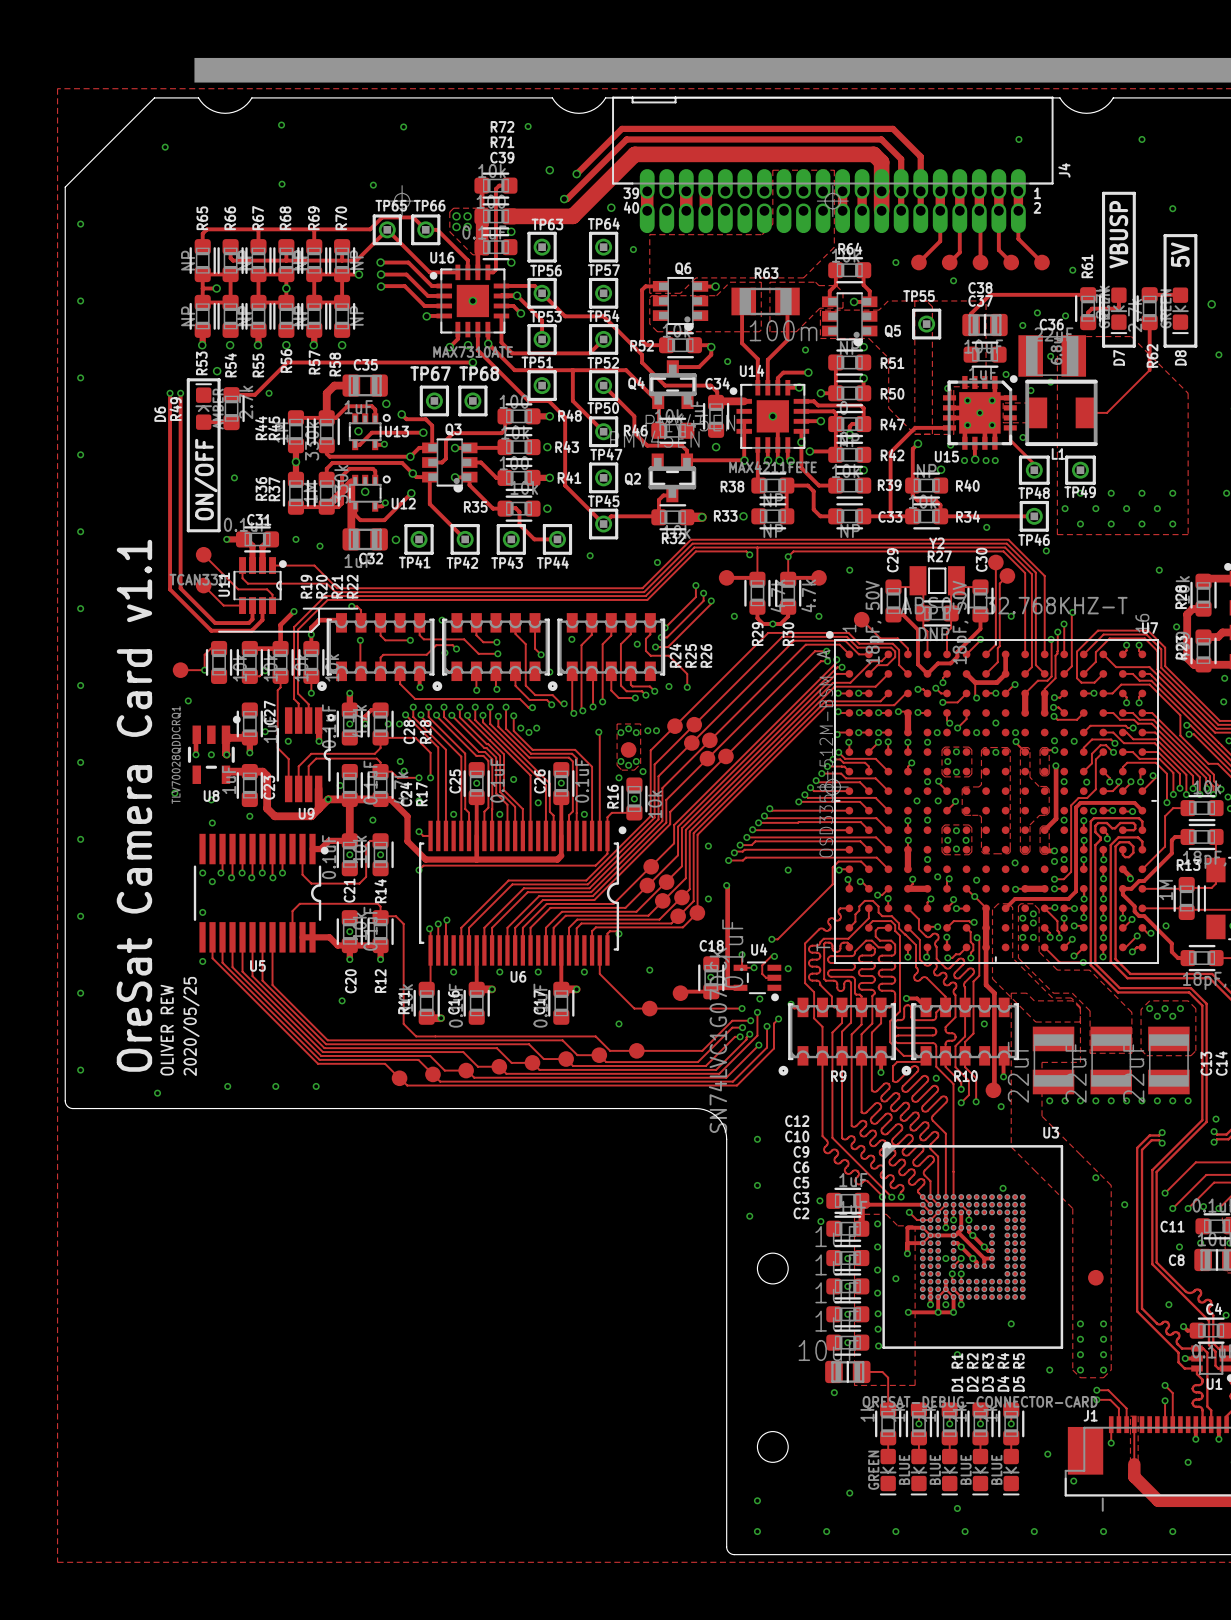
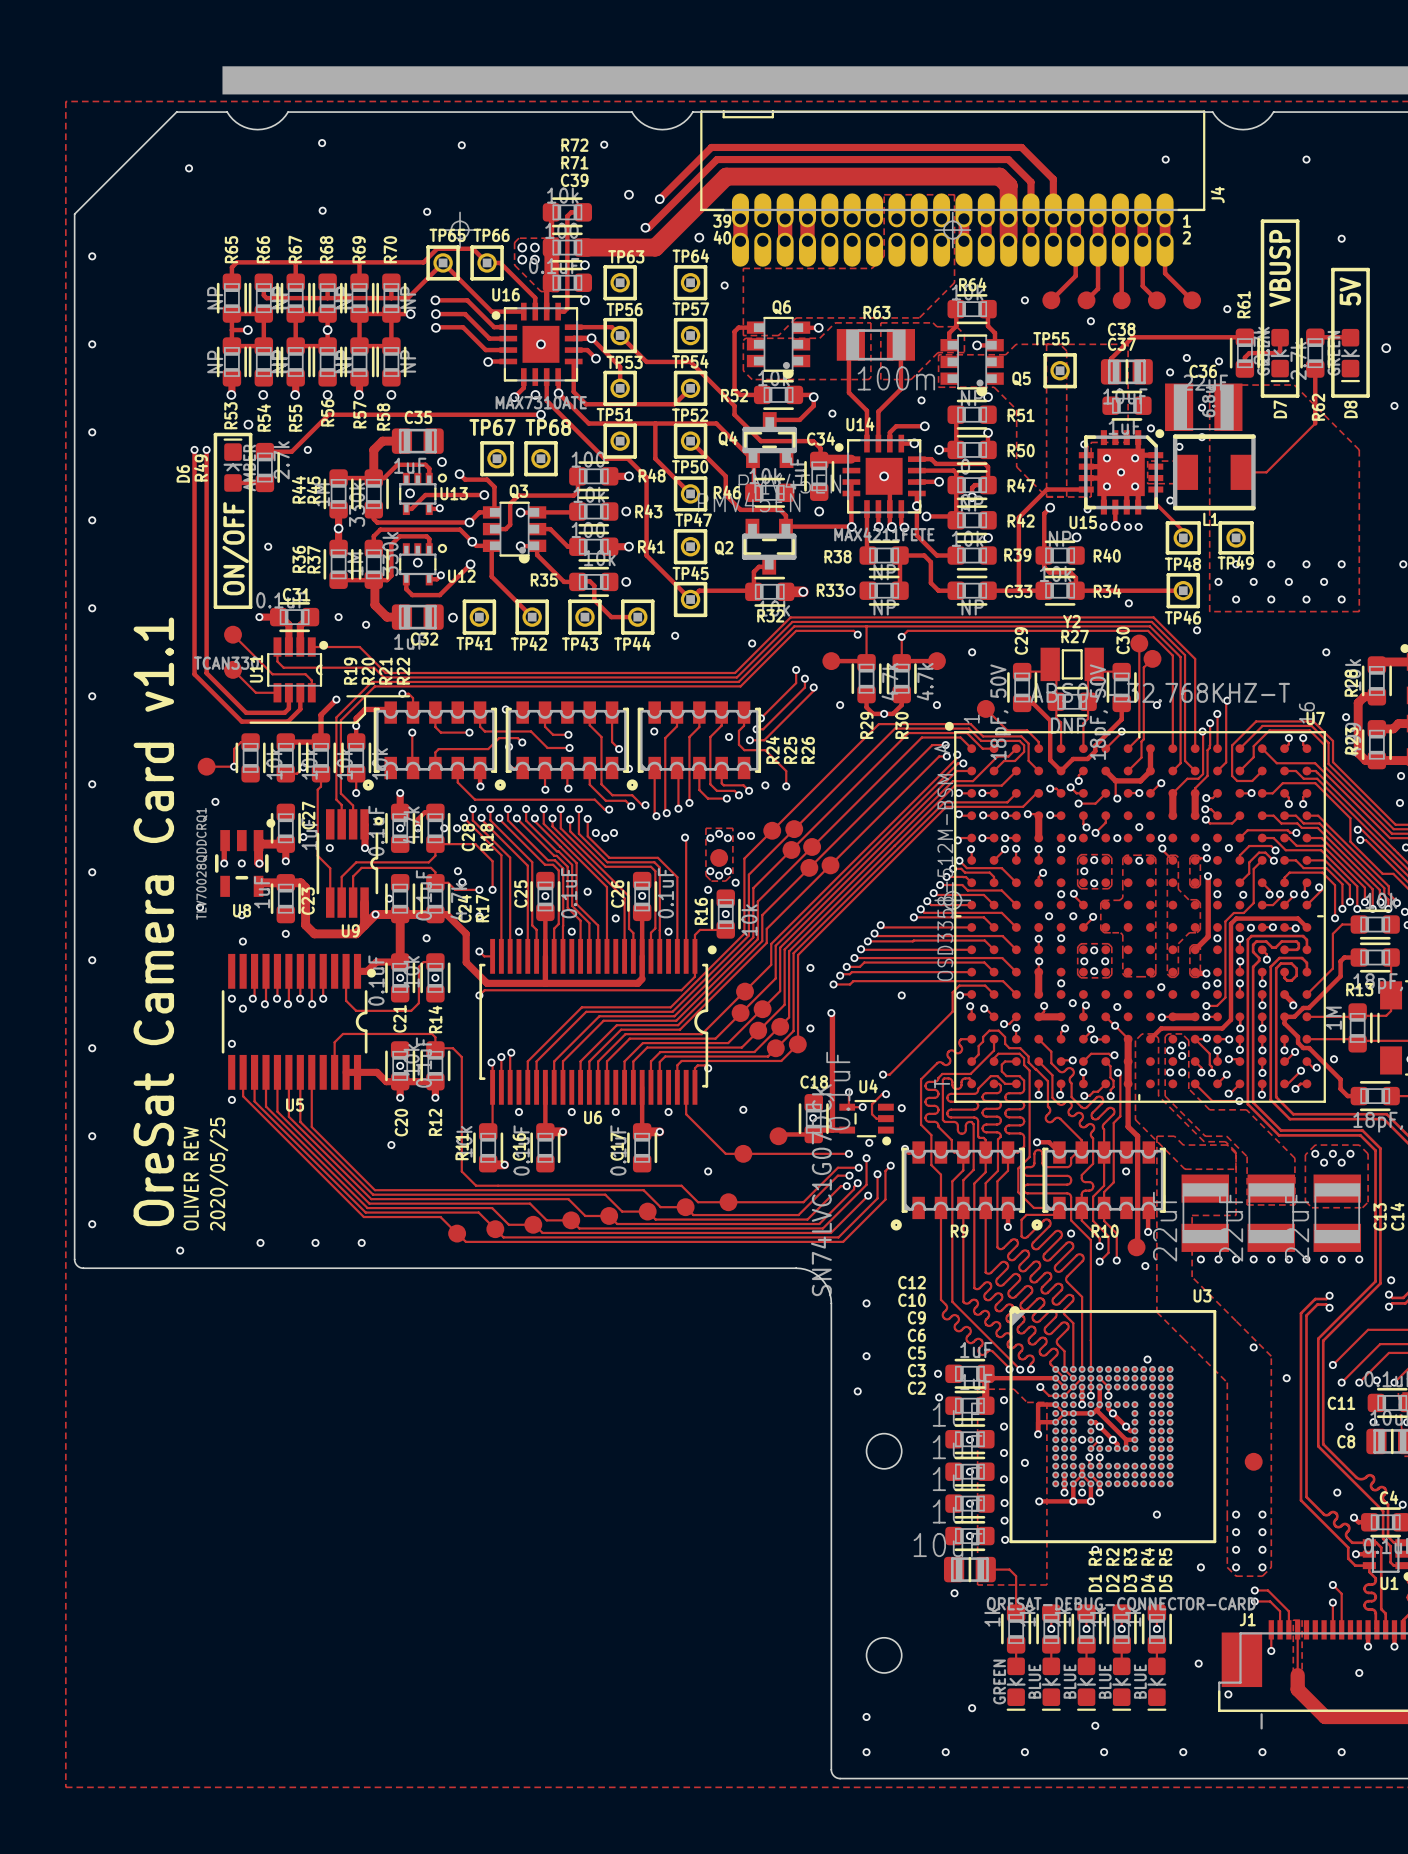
track: (326, 507) (351, 482) (351, 539) -> (374, 580) (374, 605) (387, 617) (401, 617)

